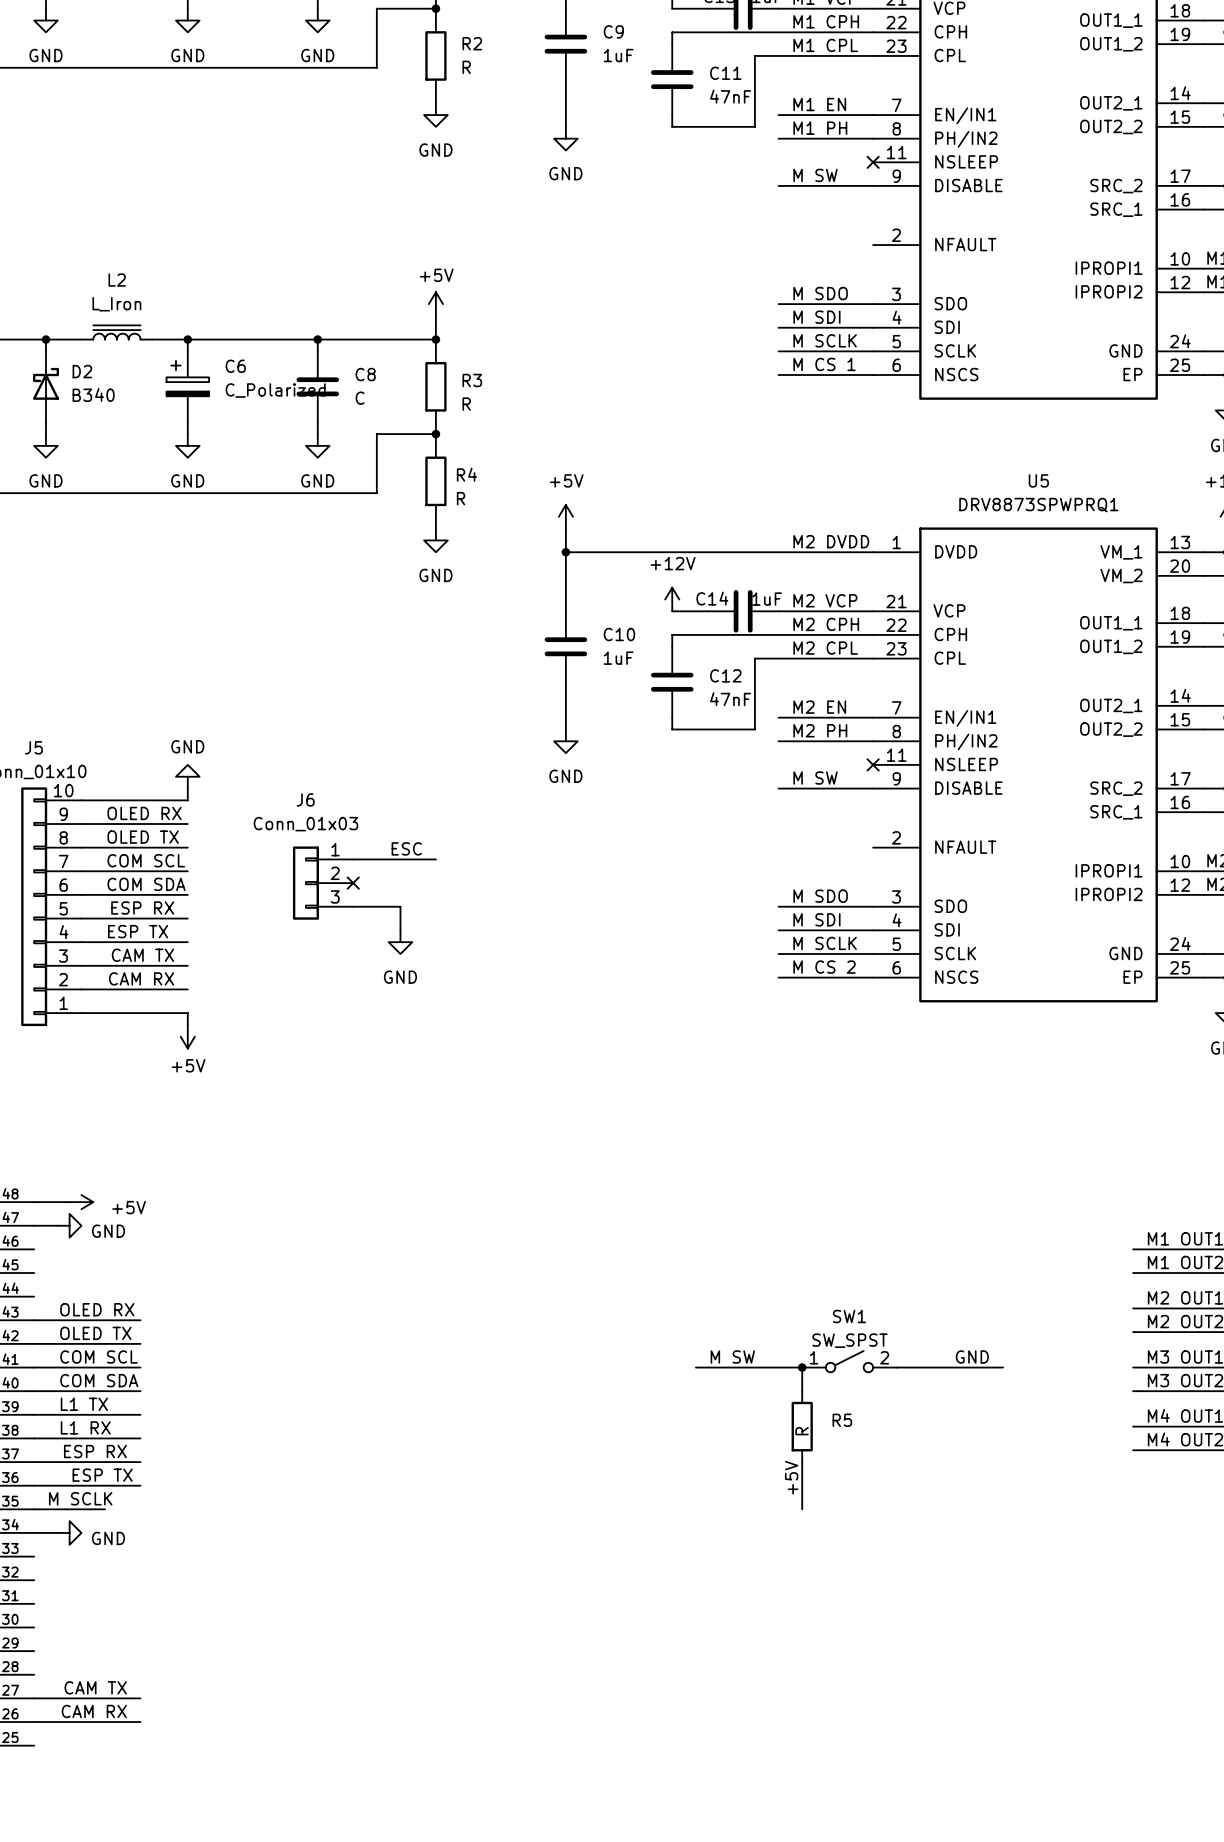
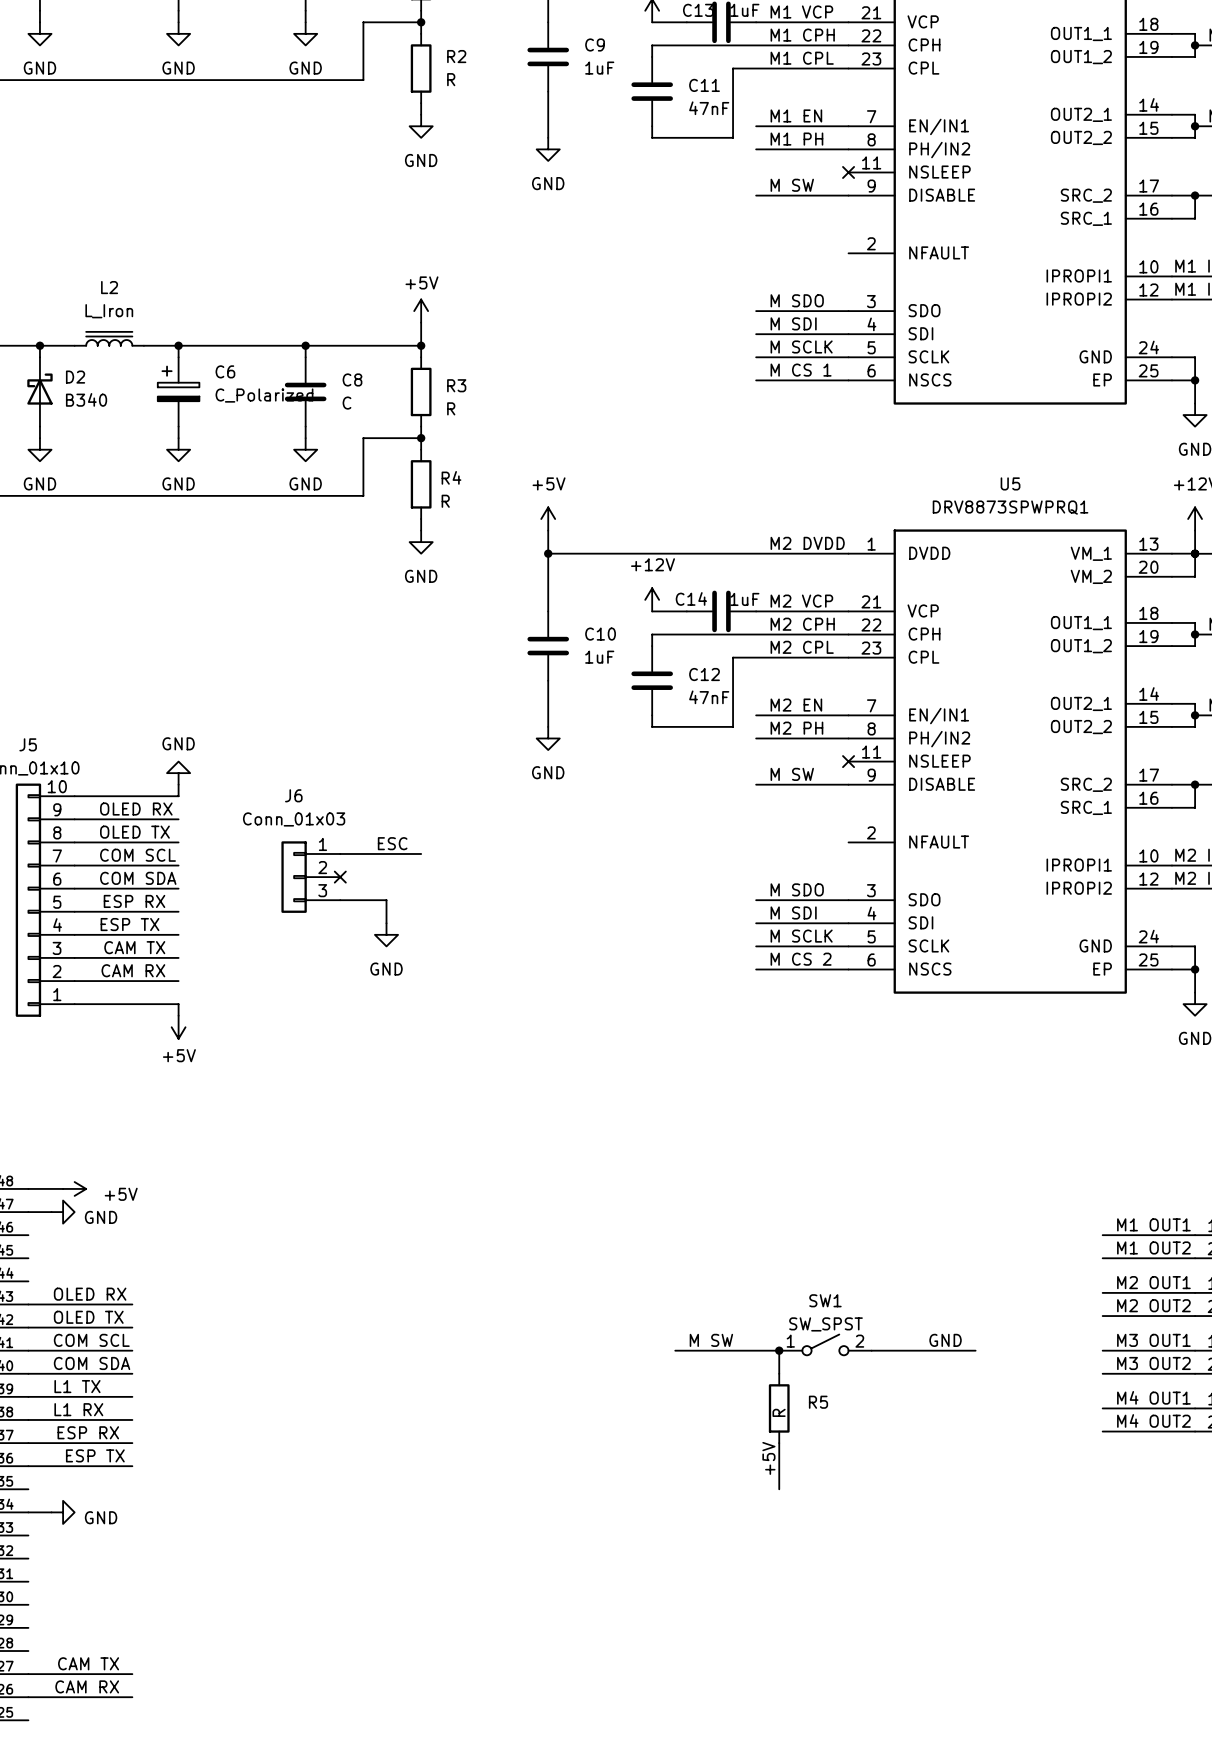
label: M SCLK (80, 1498) -> none
wire: (34, 1509) (105, 1509) -> none

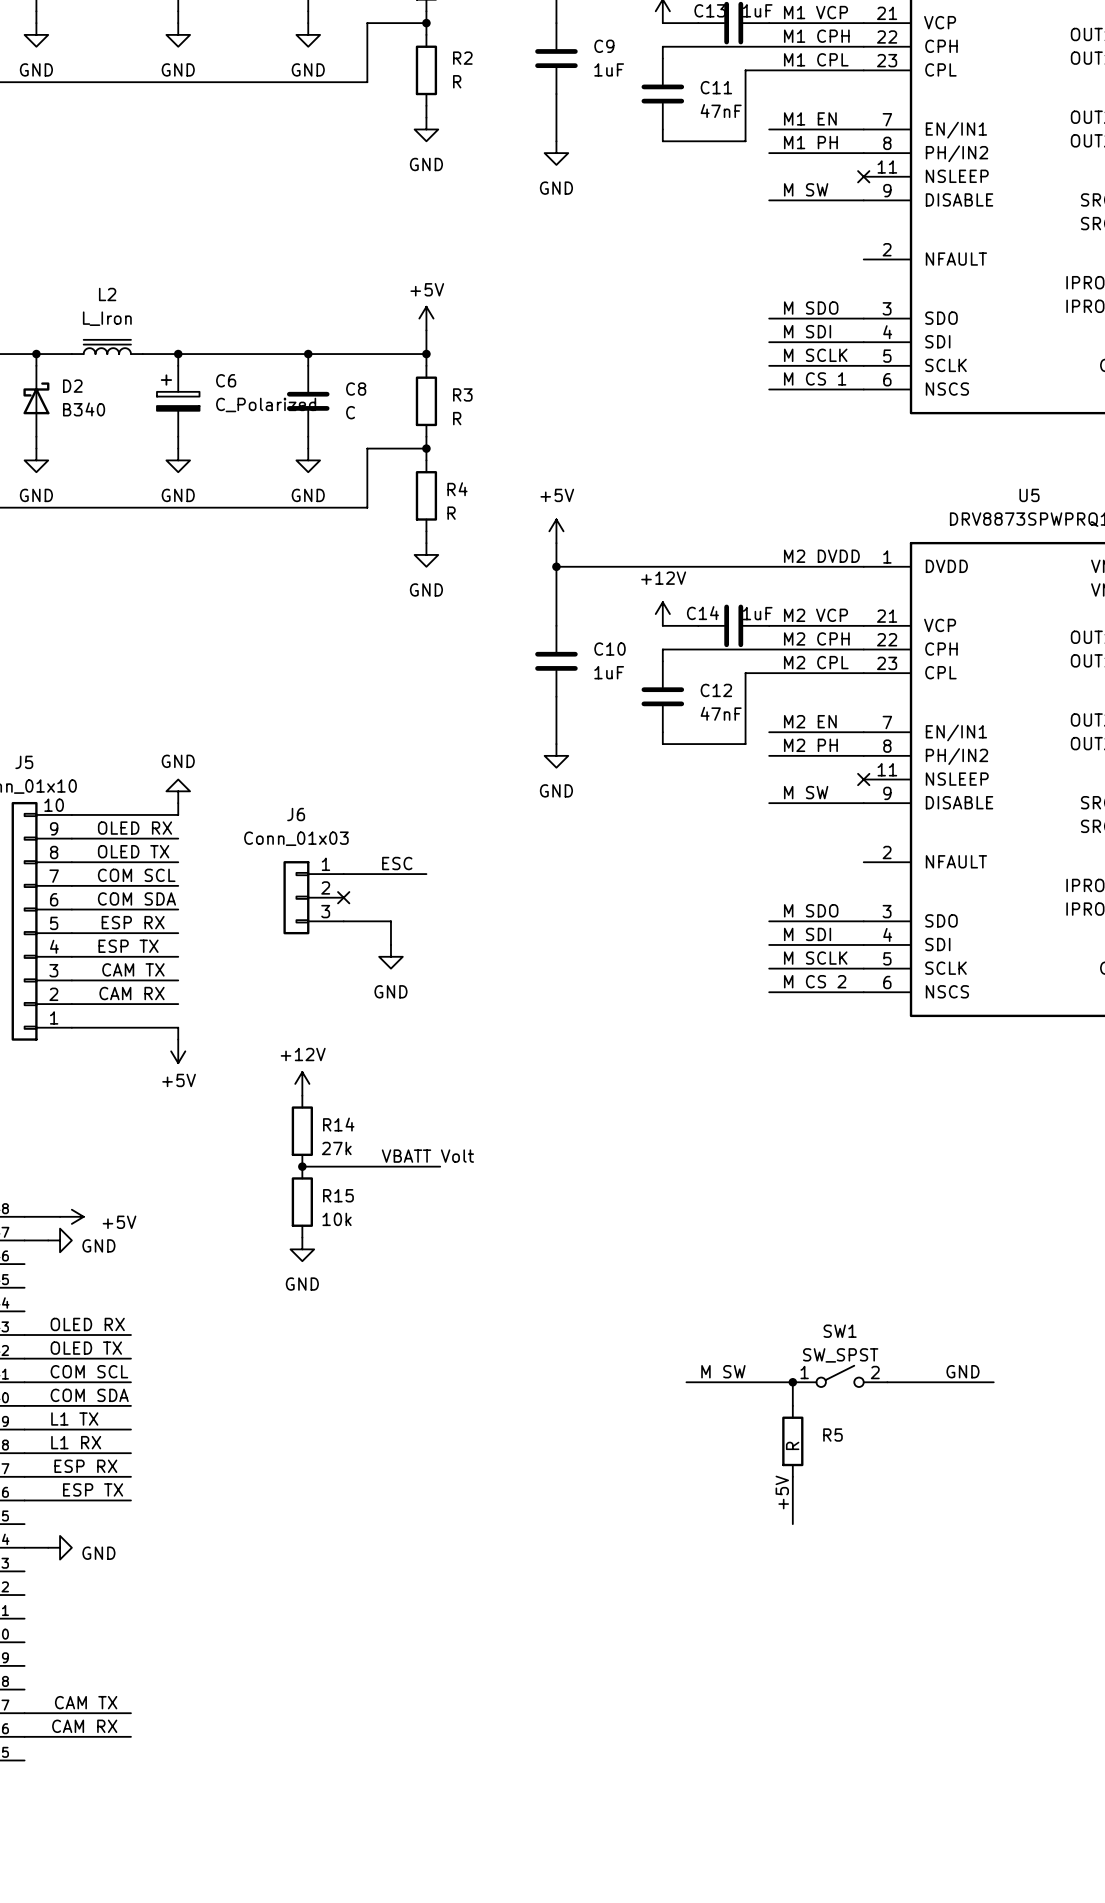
power symbol: none -> +12V (302, 1083)
R14: none -> 27k (302, 1131)
label: none -> VBATT Volt (427, 1156)
wire: none -> (302, 1166) (440, 1166)
junction: none -> (302, 1166)
R15: none -> 10k (302, 1202)
power symbol: none -> GND (302, 1249)

